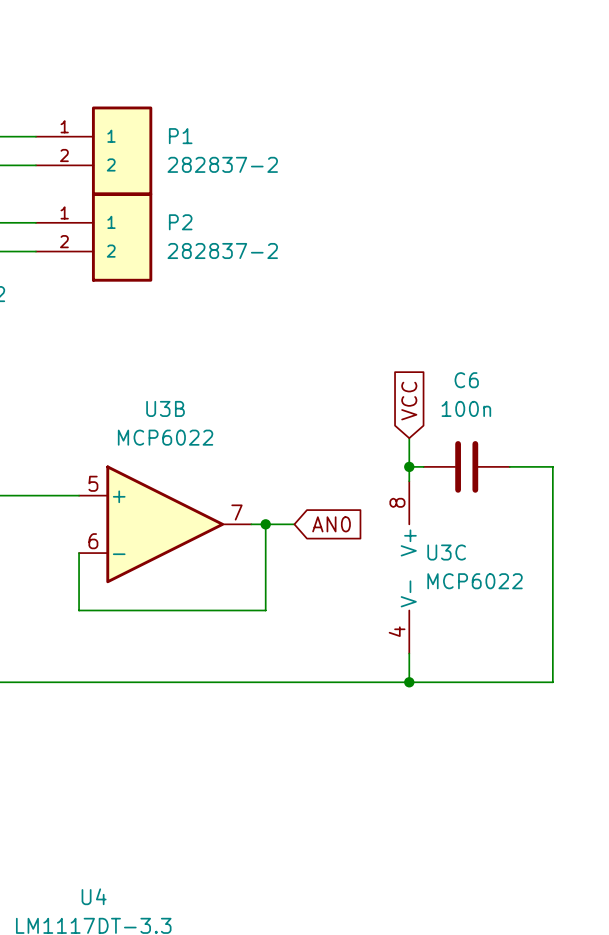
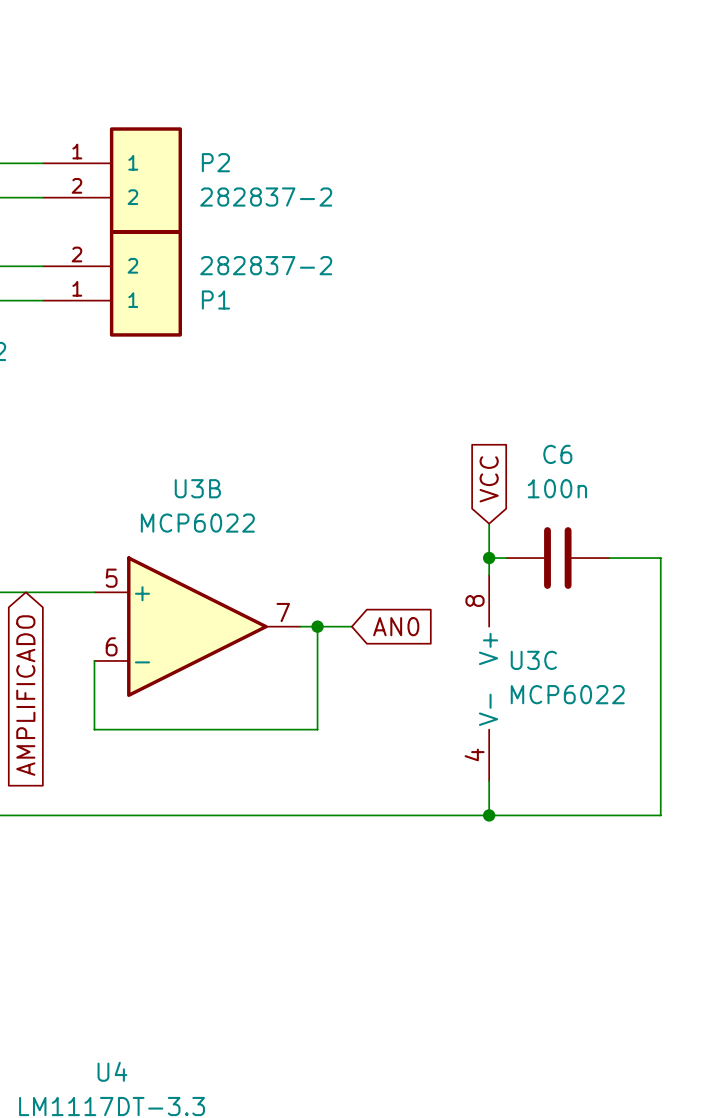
P1 name: P1 (180, 136) -> P2 (215, 162)
P2 name: P2 (180, 222) -> P1 (215, 299)
P2 flip: as is (122, 237) -> up-down (145, 283)
global label: none -> AMPLIFICADO (25, 695)

